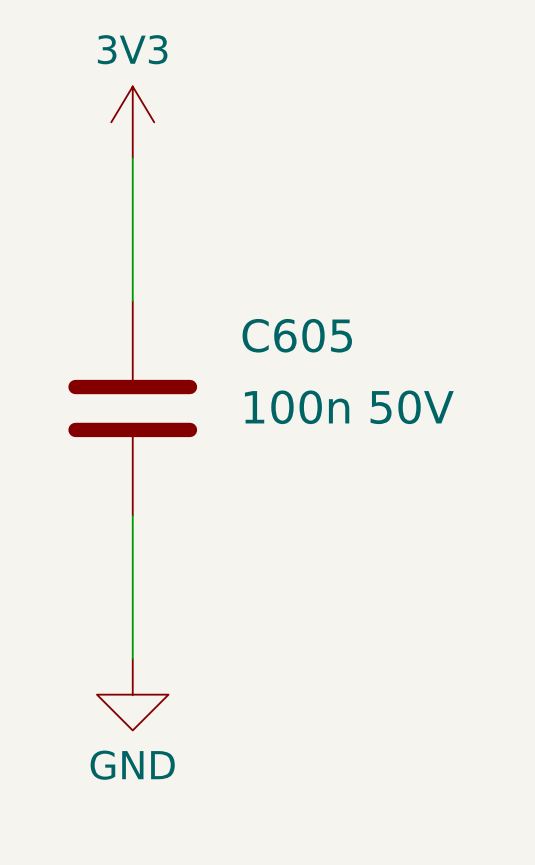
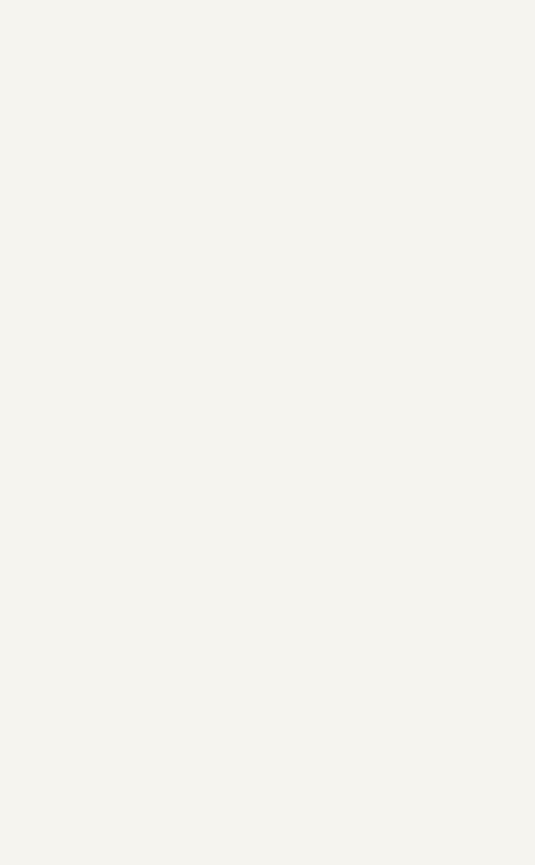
power symbol: 3V3 (132, 122) -> none
wire: (132, 158) (132, 301) -> none
C605: 100n 50V (132, 408) -> none
wire: (132, 515) (132, 658) -> none
power symbol: GND (132, 694) -> none

